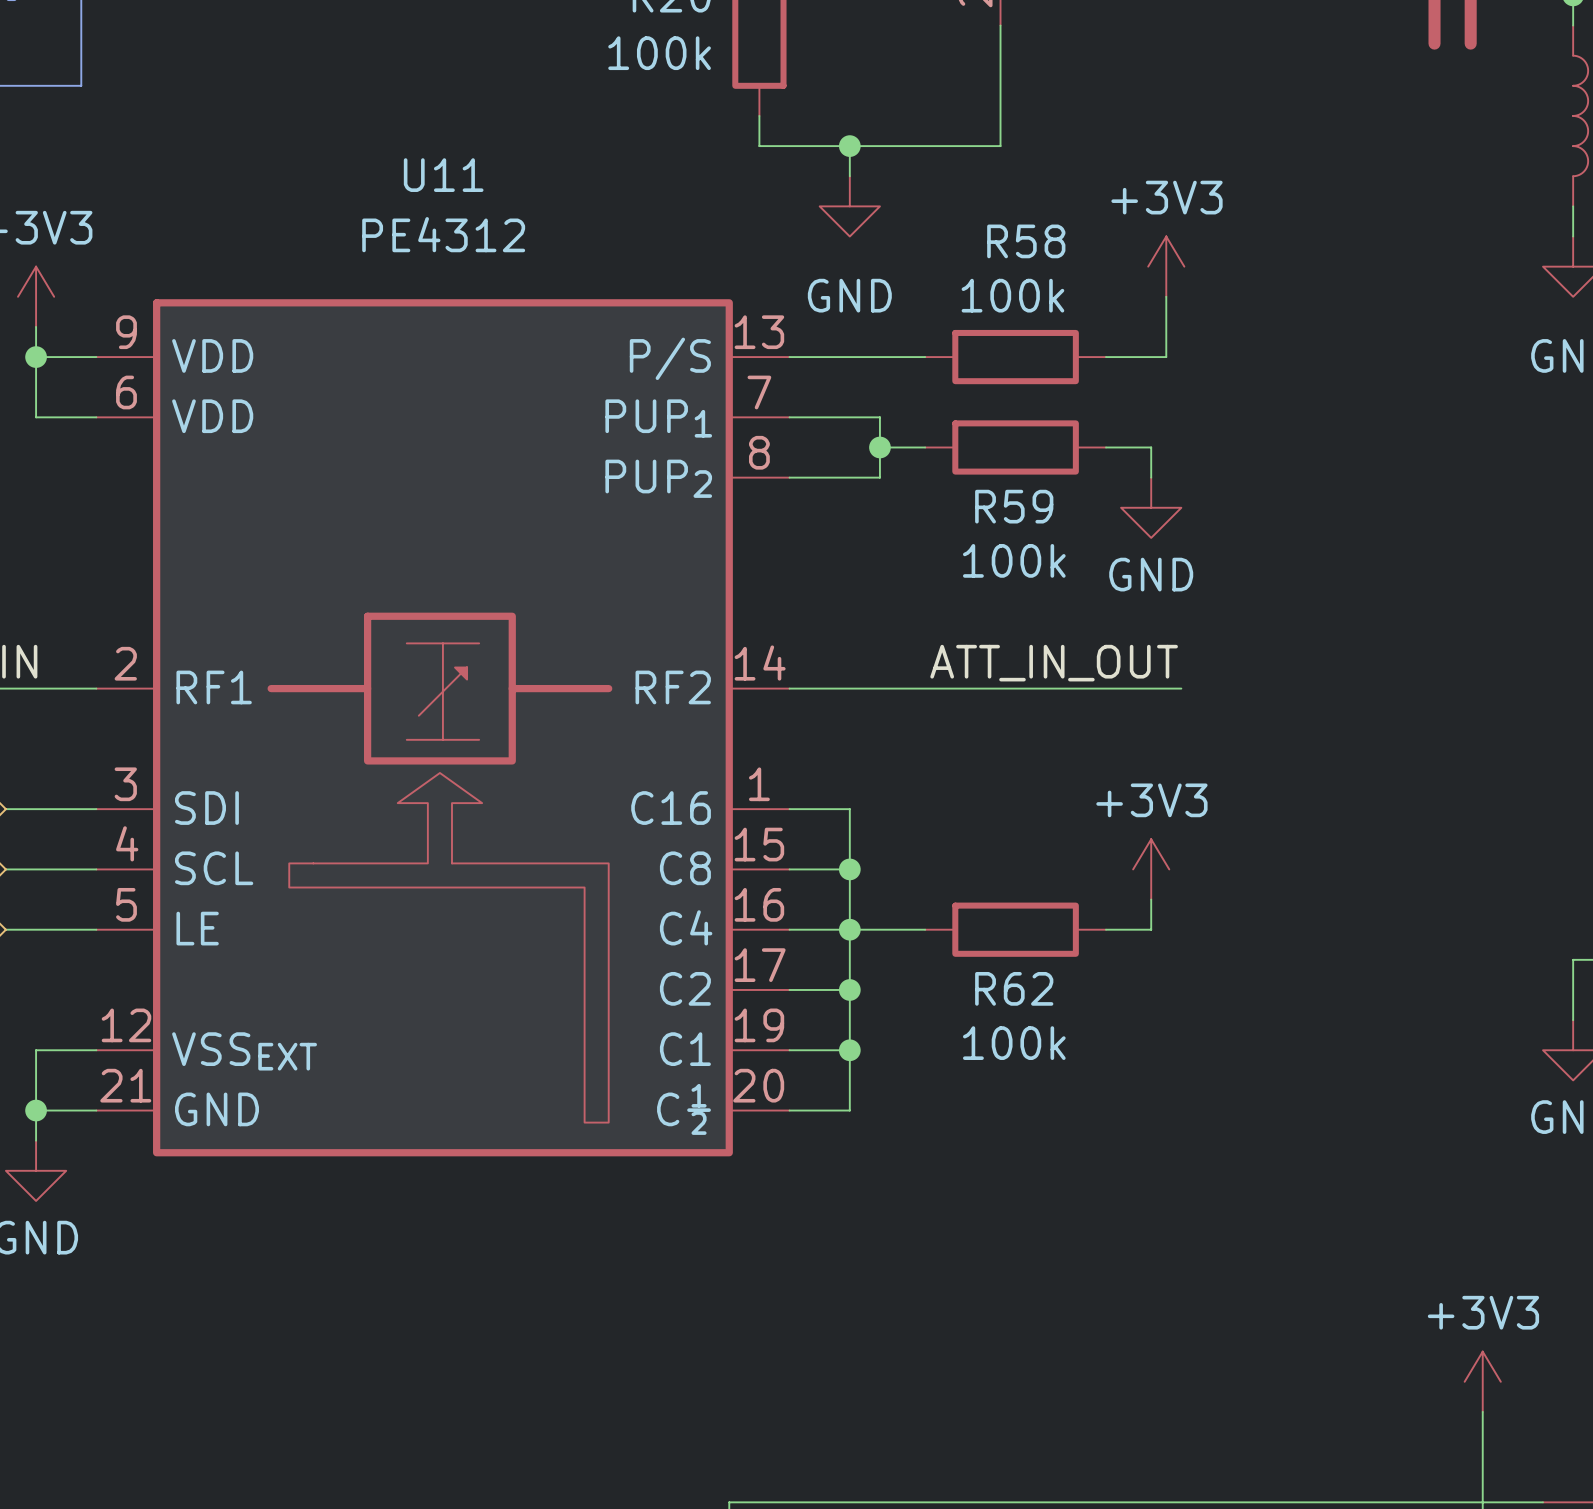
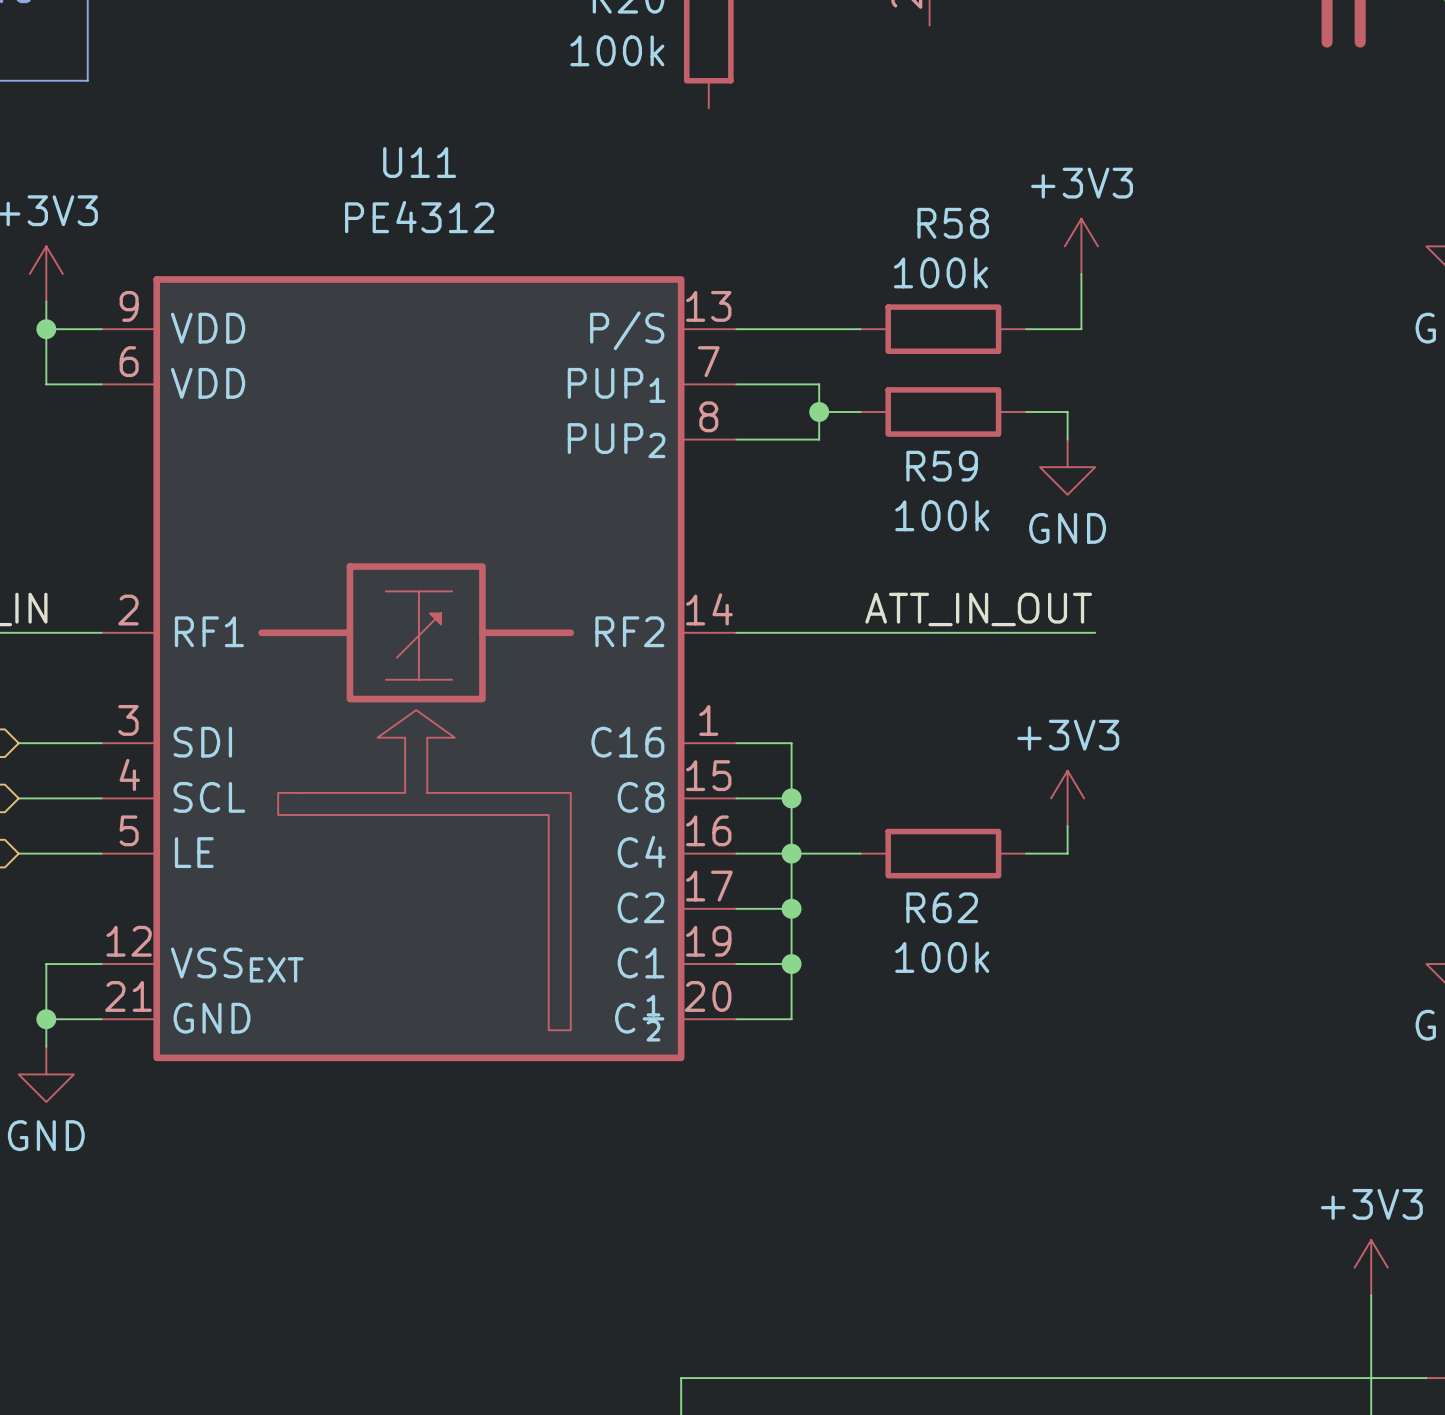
wire: (1000, 25) (1000, 146) (759, 146) (759, 115) -> none
wire: (849, 146) (849, 176) -> none
junction: (849, 146) -> none
power symbol: GND (849, 206) -> none

